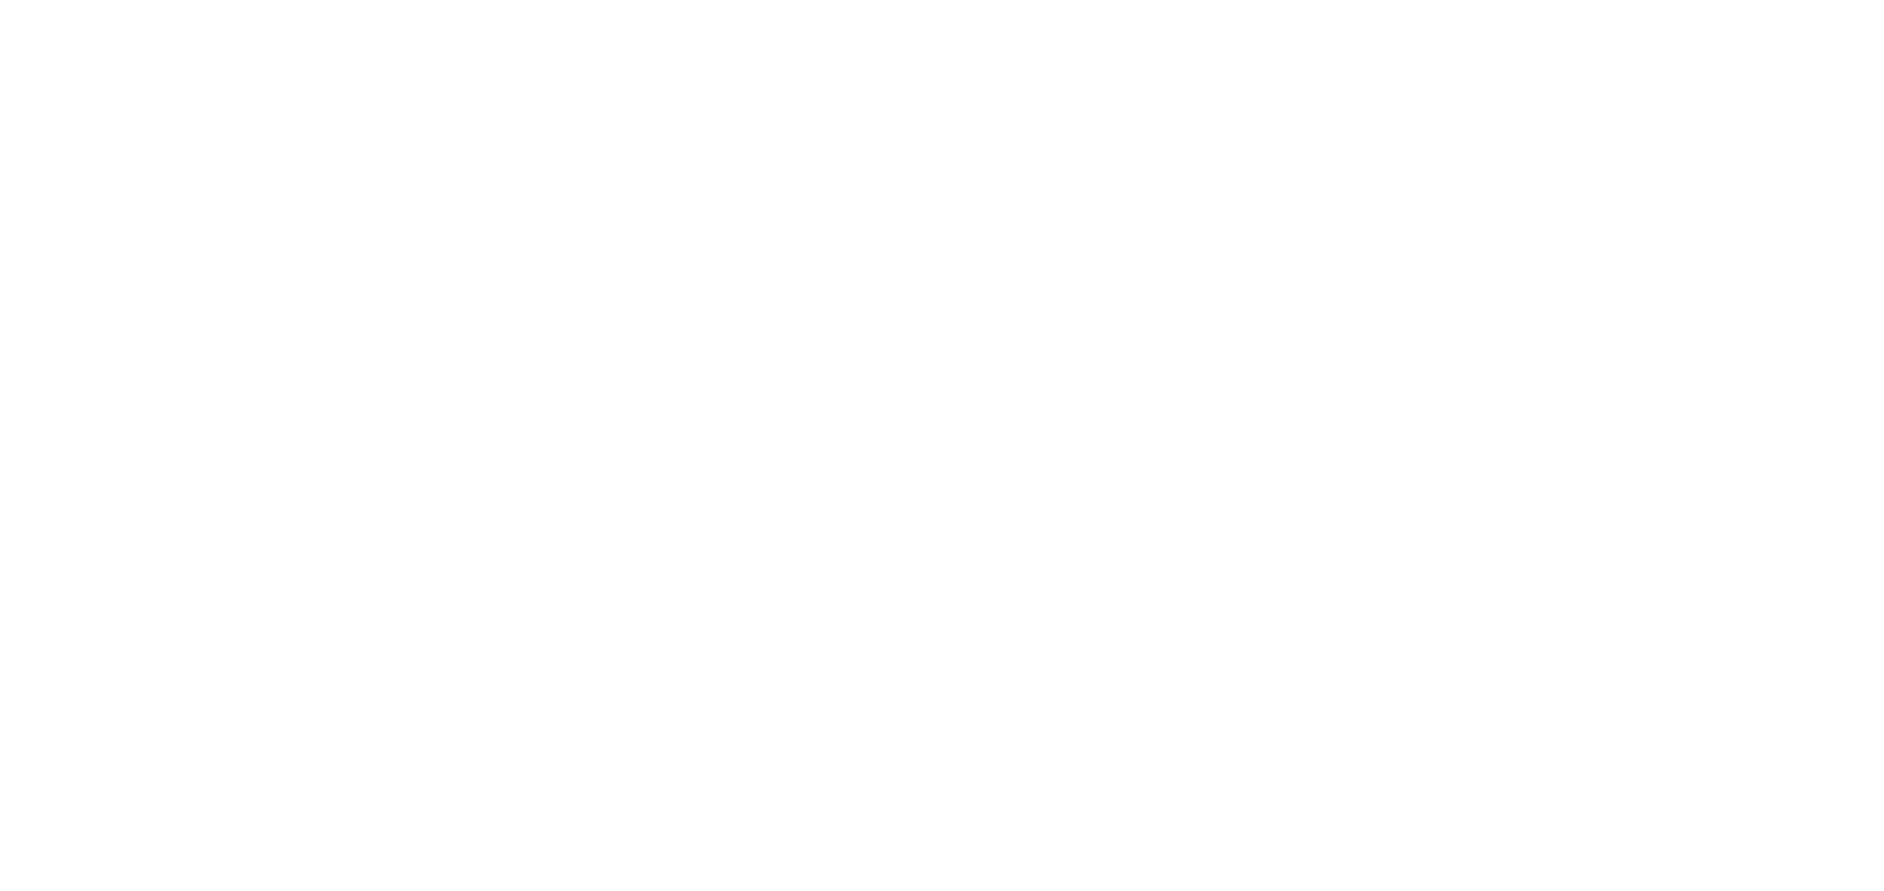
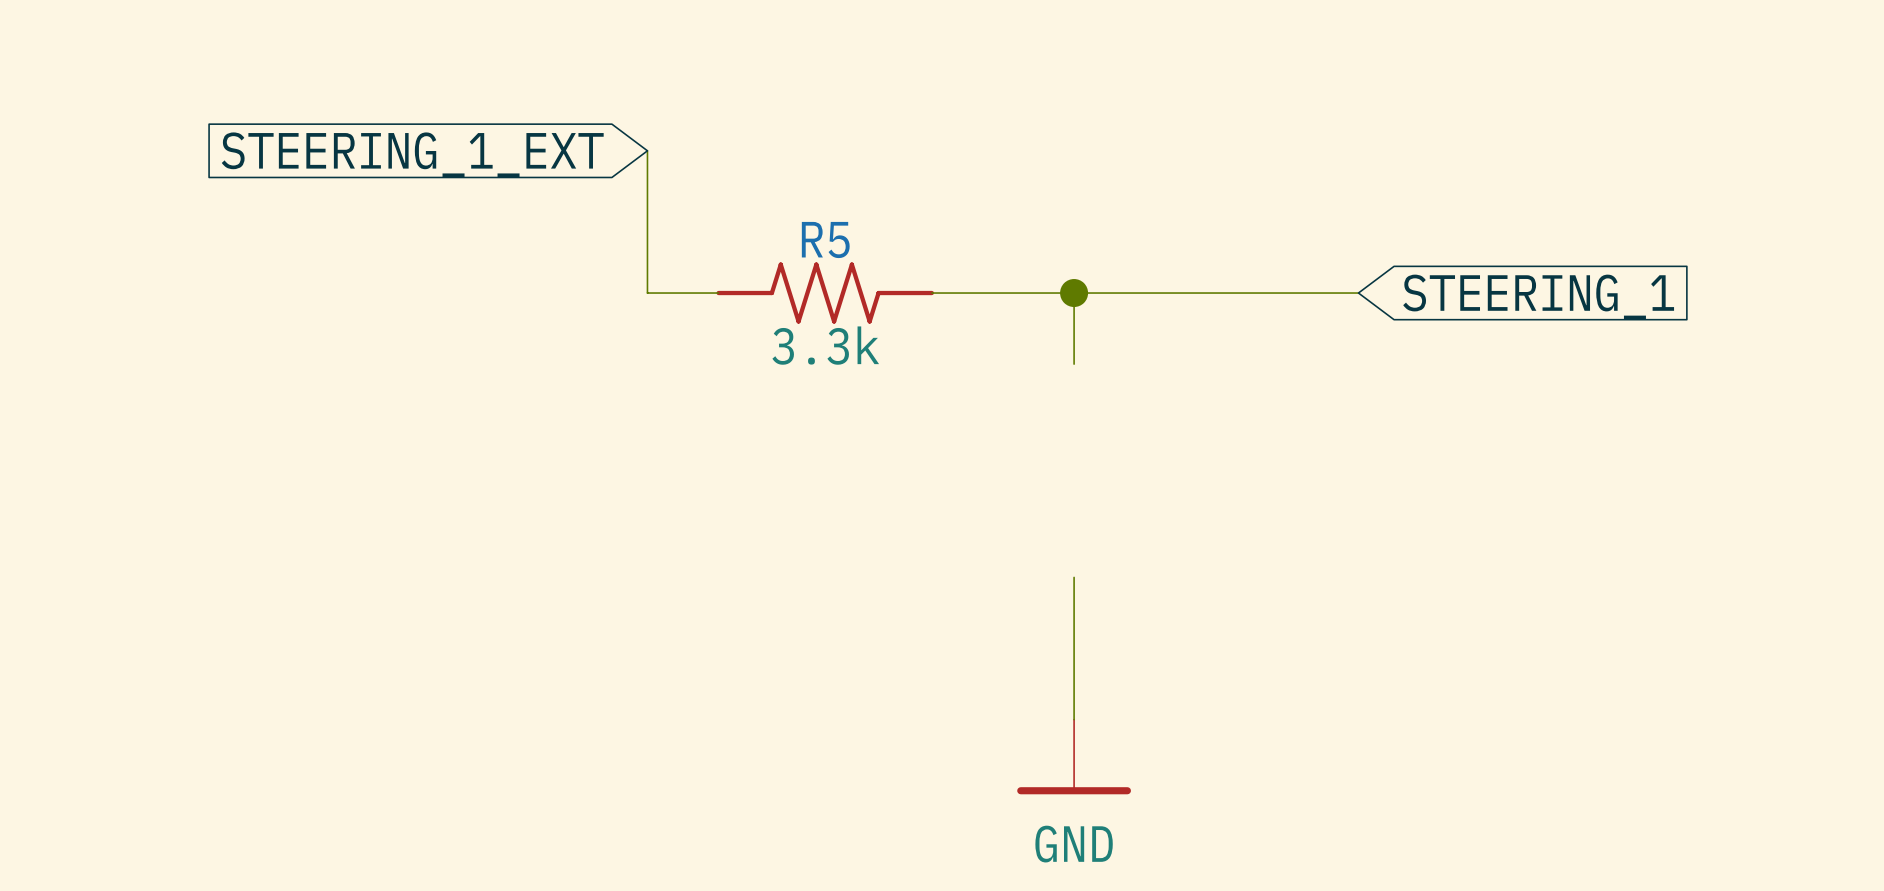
wire: none -> (647, 150) (647, 293) (718, 293)
global label: none -> STEERING_1_EXT (412, 154)
R5: none -> (825, 293)
wire: none -> (931, 293) (1358, 293)
wire: none -> (1074, 293) (1074, 364)
junction: none -> (1074, 293)
global label: none -> STEERING_1 (1538, 297)
wire: none -> (1074, 577) (1074, 719)
power symbol: none -> GND (1074, 756)

